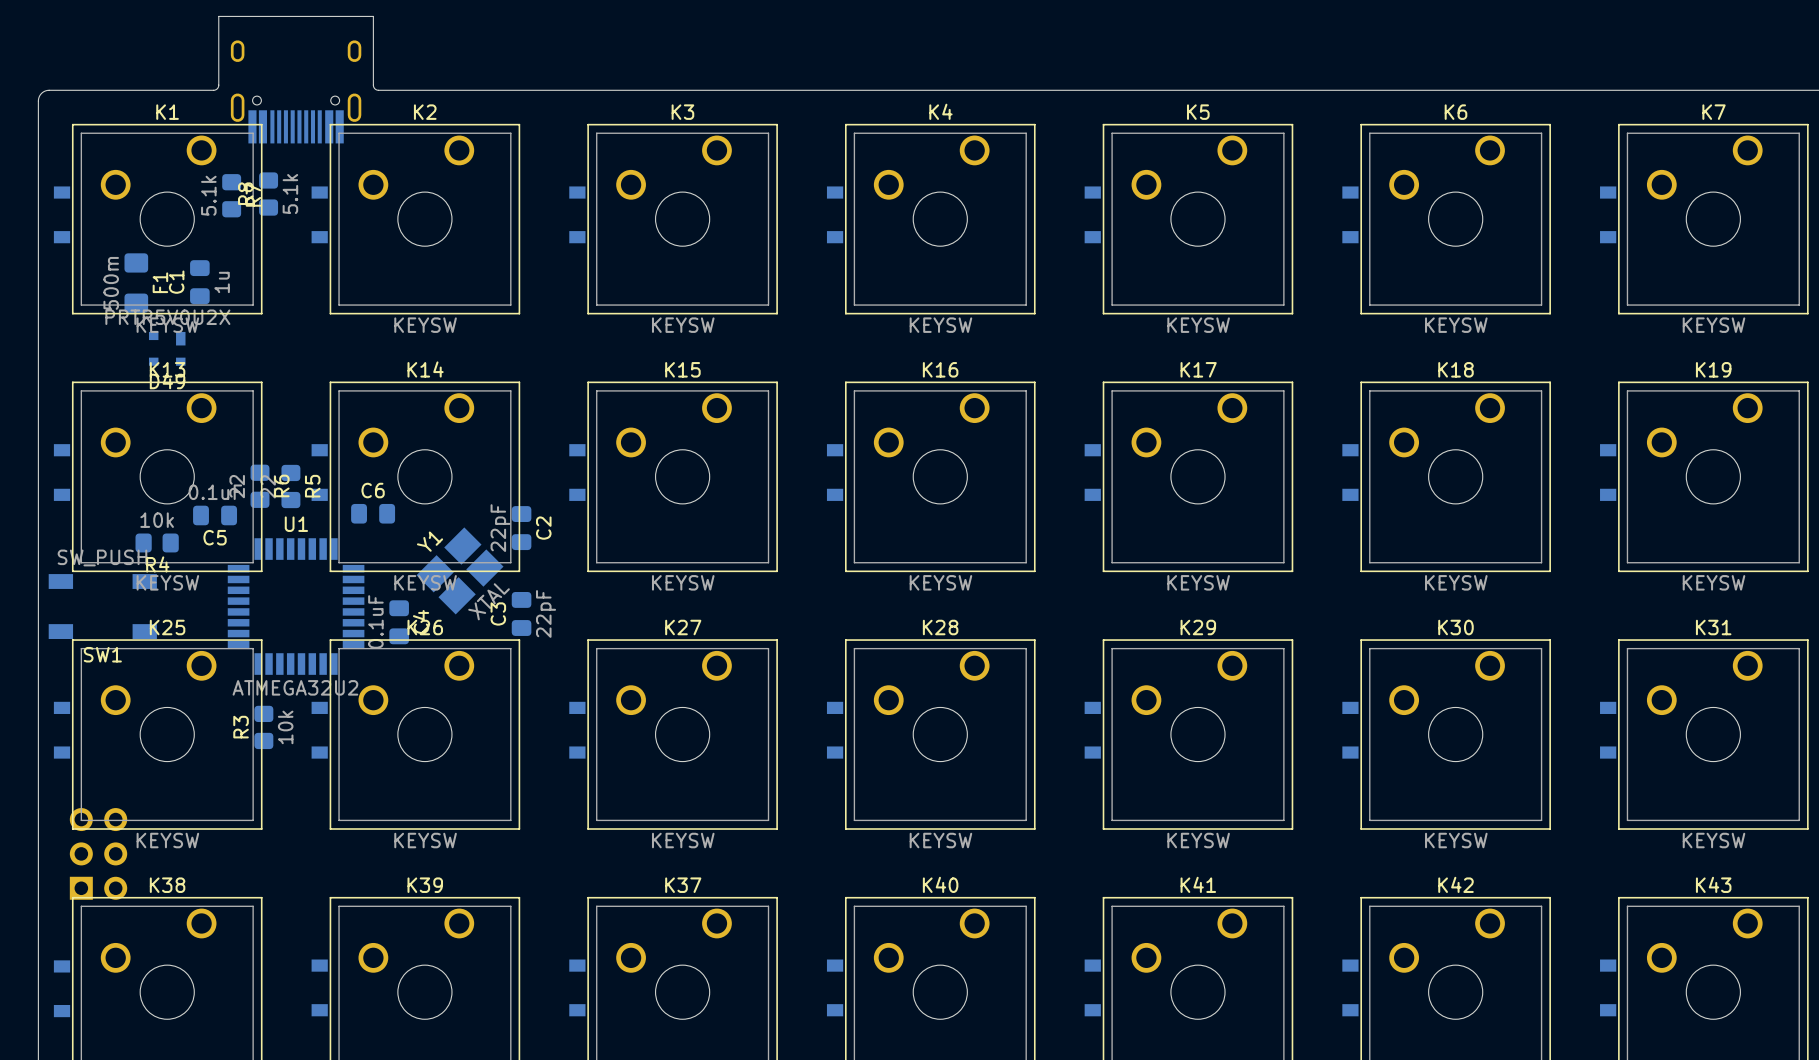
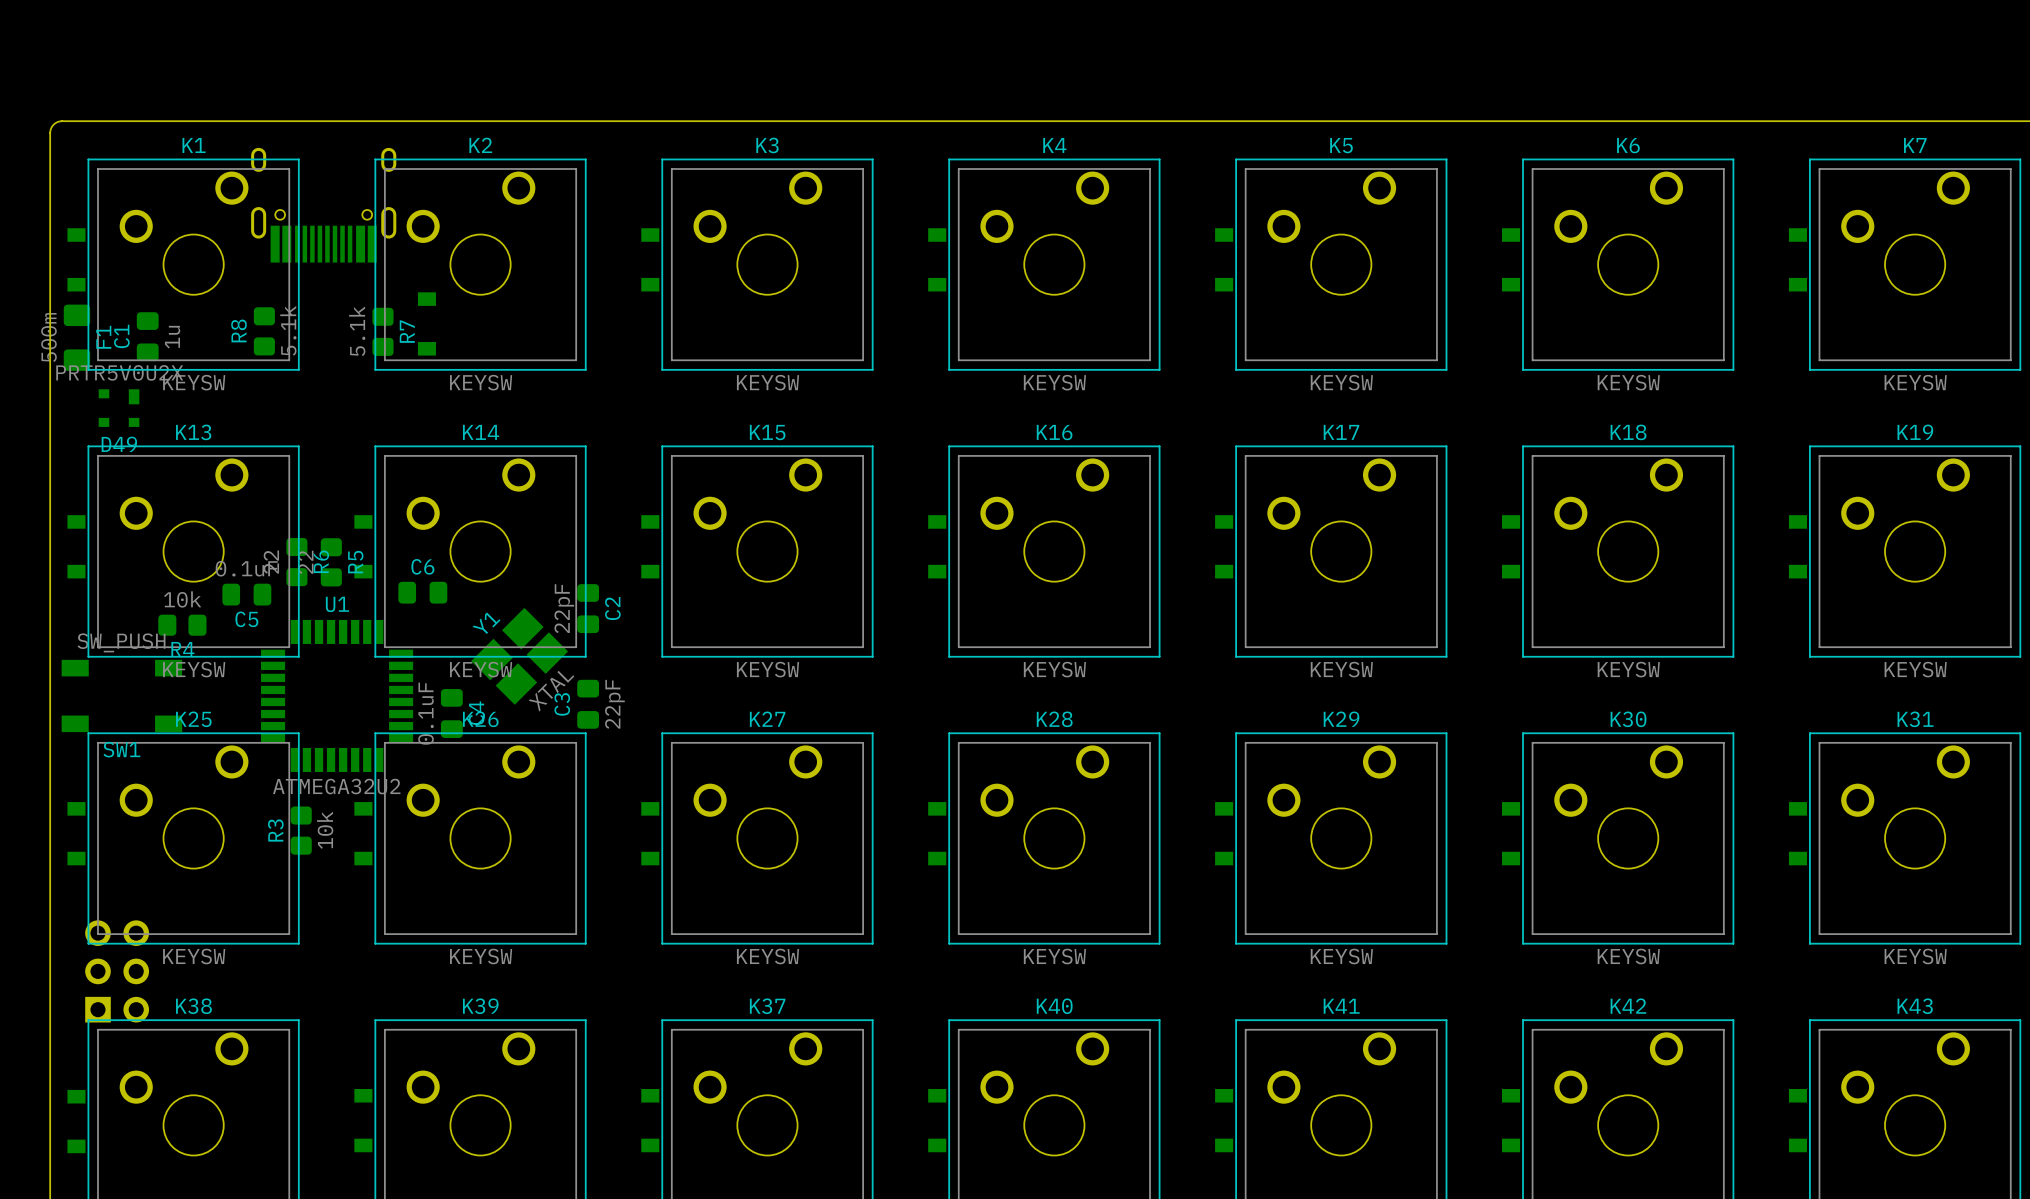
board edge: (213, 90) (218, 85) (218, 16) (373, 16) (373, 85) (378, 90) -> (245, 121) (428, 121)
part position: (296, 91) -> (323, 205)
R8 position: (268, 194) -> (264, 331)
R7 position: (231, 195) -> (382, 331)
part position: (319, 214) -> (426, 323)
C1 position: (199, 282) -> (147, 336)
F1 position: (136, 283) -> (76, 337)
D49 position: (167, 348) -> (119, 408)

